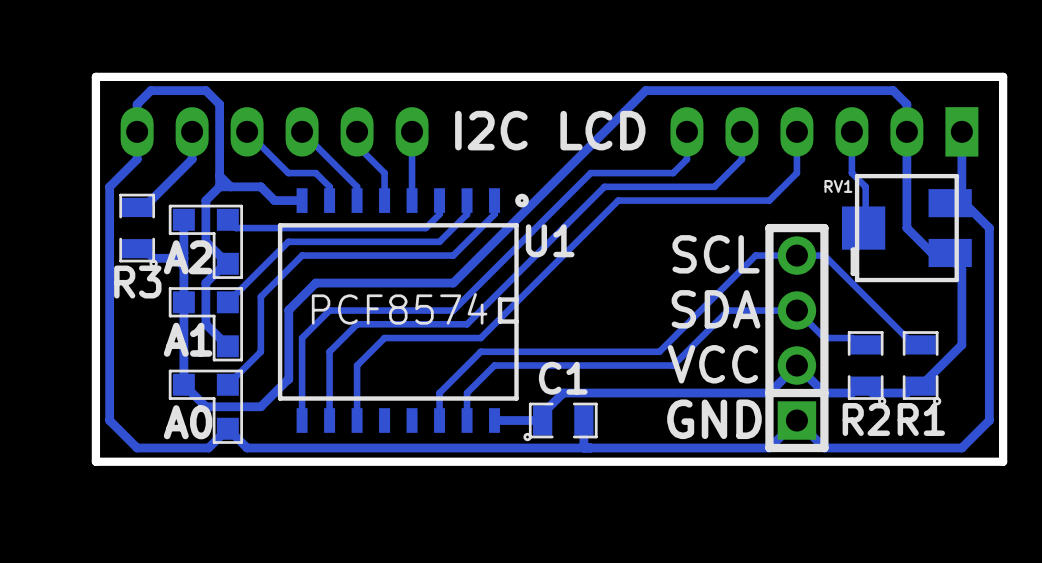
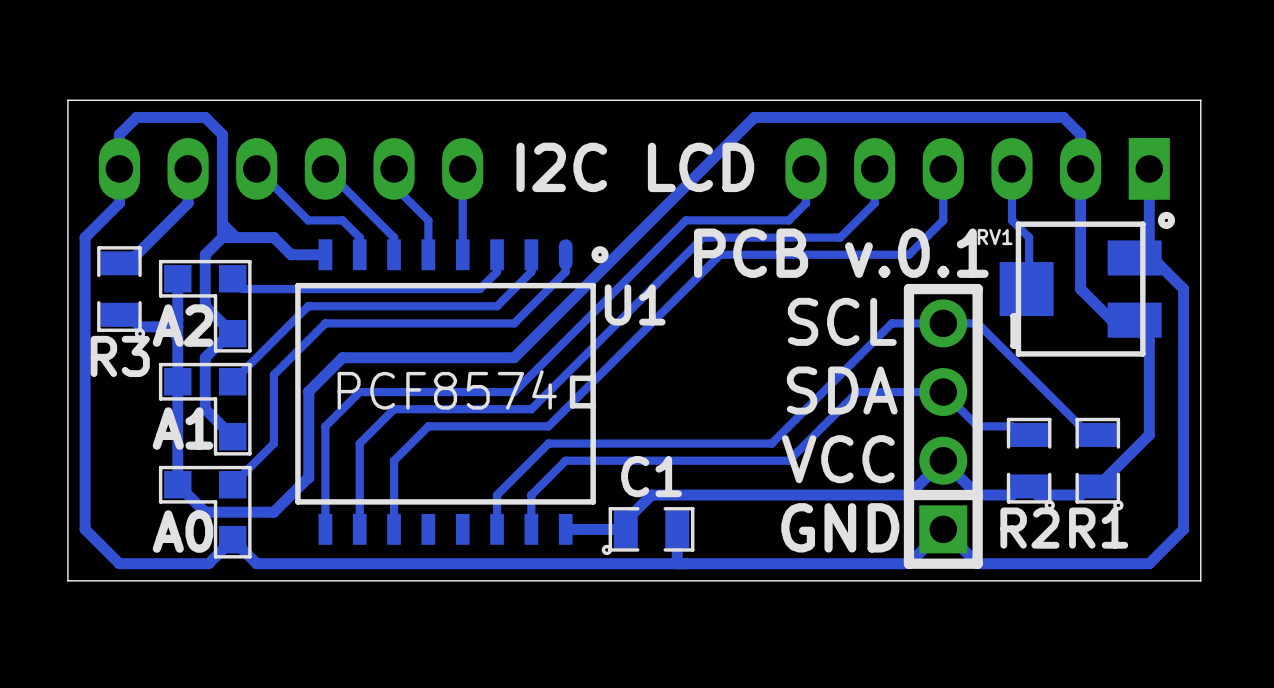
board edge width: thick (1003, 76) (1003, 461) (95, 461) (95, 76) (1003, 76) -> thin (1200, 100) (1200, 580) (67, 580) (67, 100) (1200, 100)
drawing: none -> [1157, 211, 1176, 229]
U1 footprint: [277, 188, 519, 433] -> [295, 239, 596, 545]
text: none -> PCB v.0.1 (841, 253)

